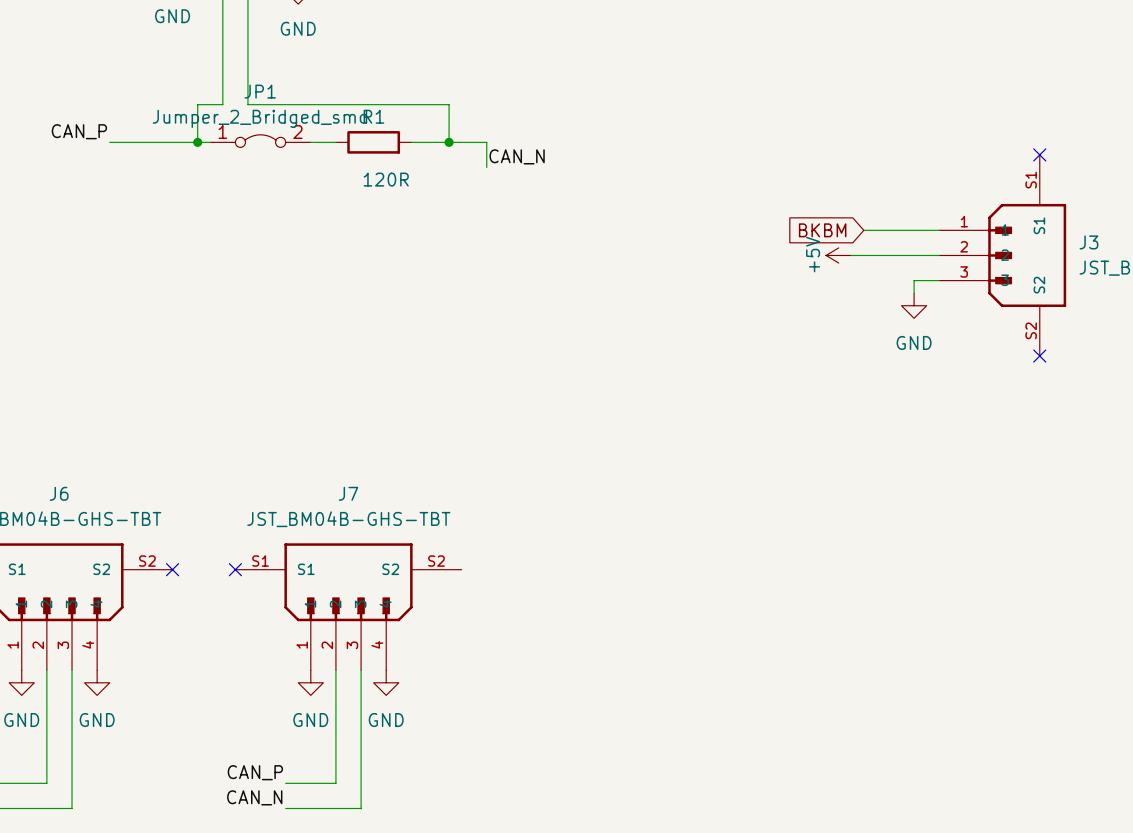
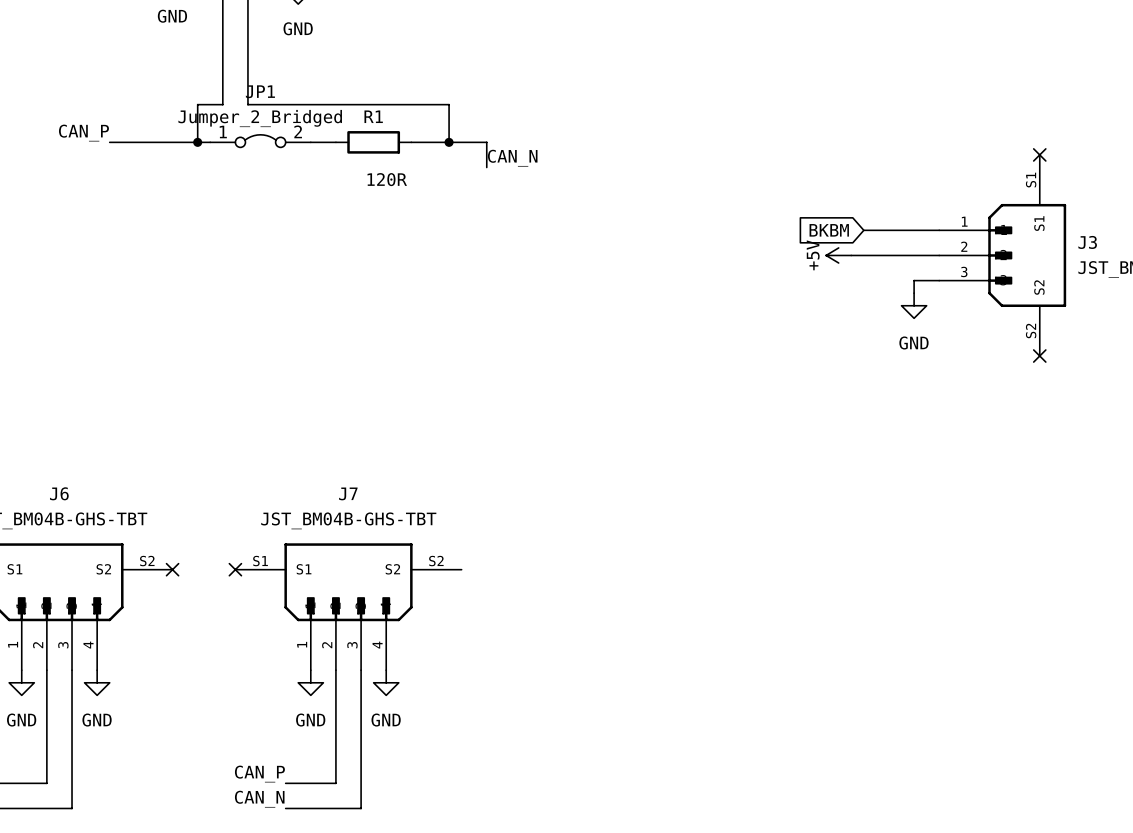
JP1 value: Jumper_2_Bridged_smd (259, 118) -> Jumper_2_Bridged (260, 118)

